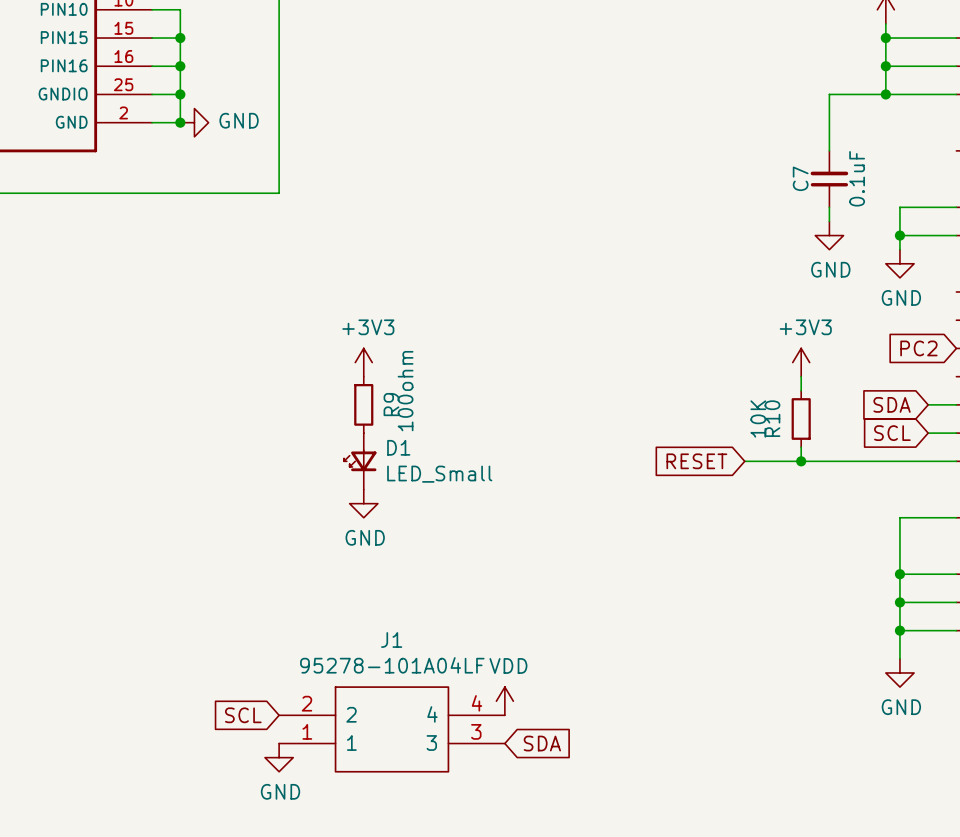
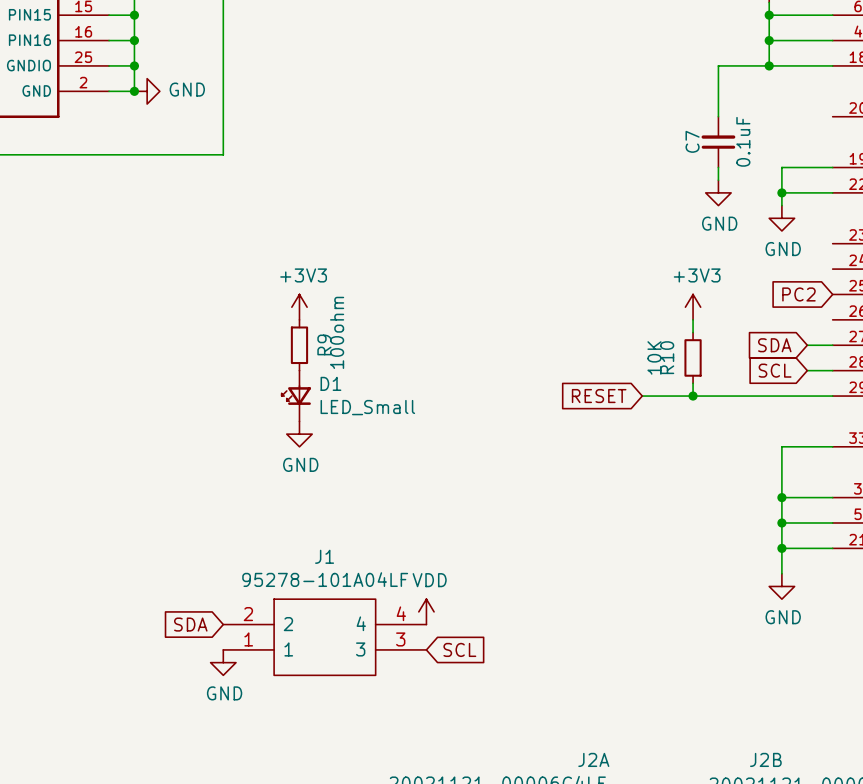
global label: SCL (243, 715) -> SDA (190, 624)
global label: SDA (542, 743) -> SCL (459, 649)

